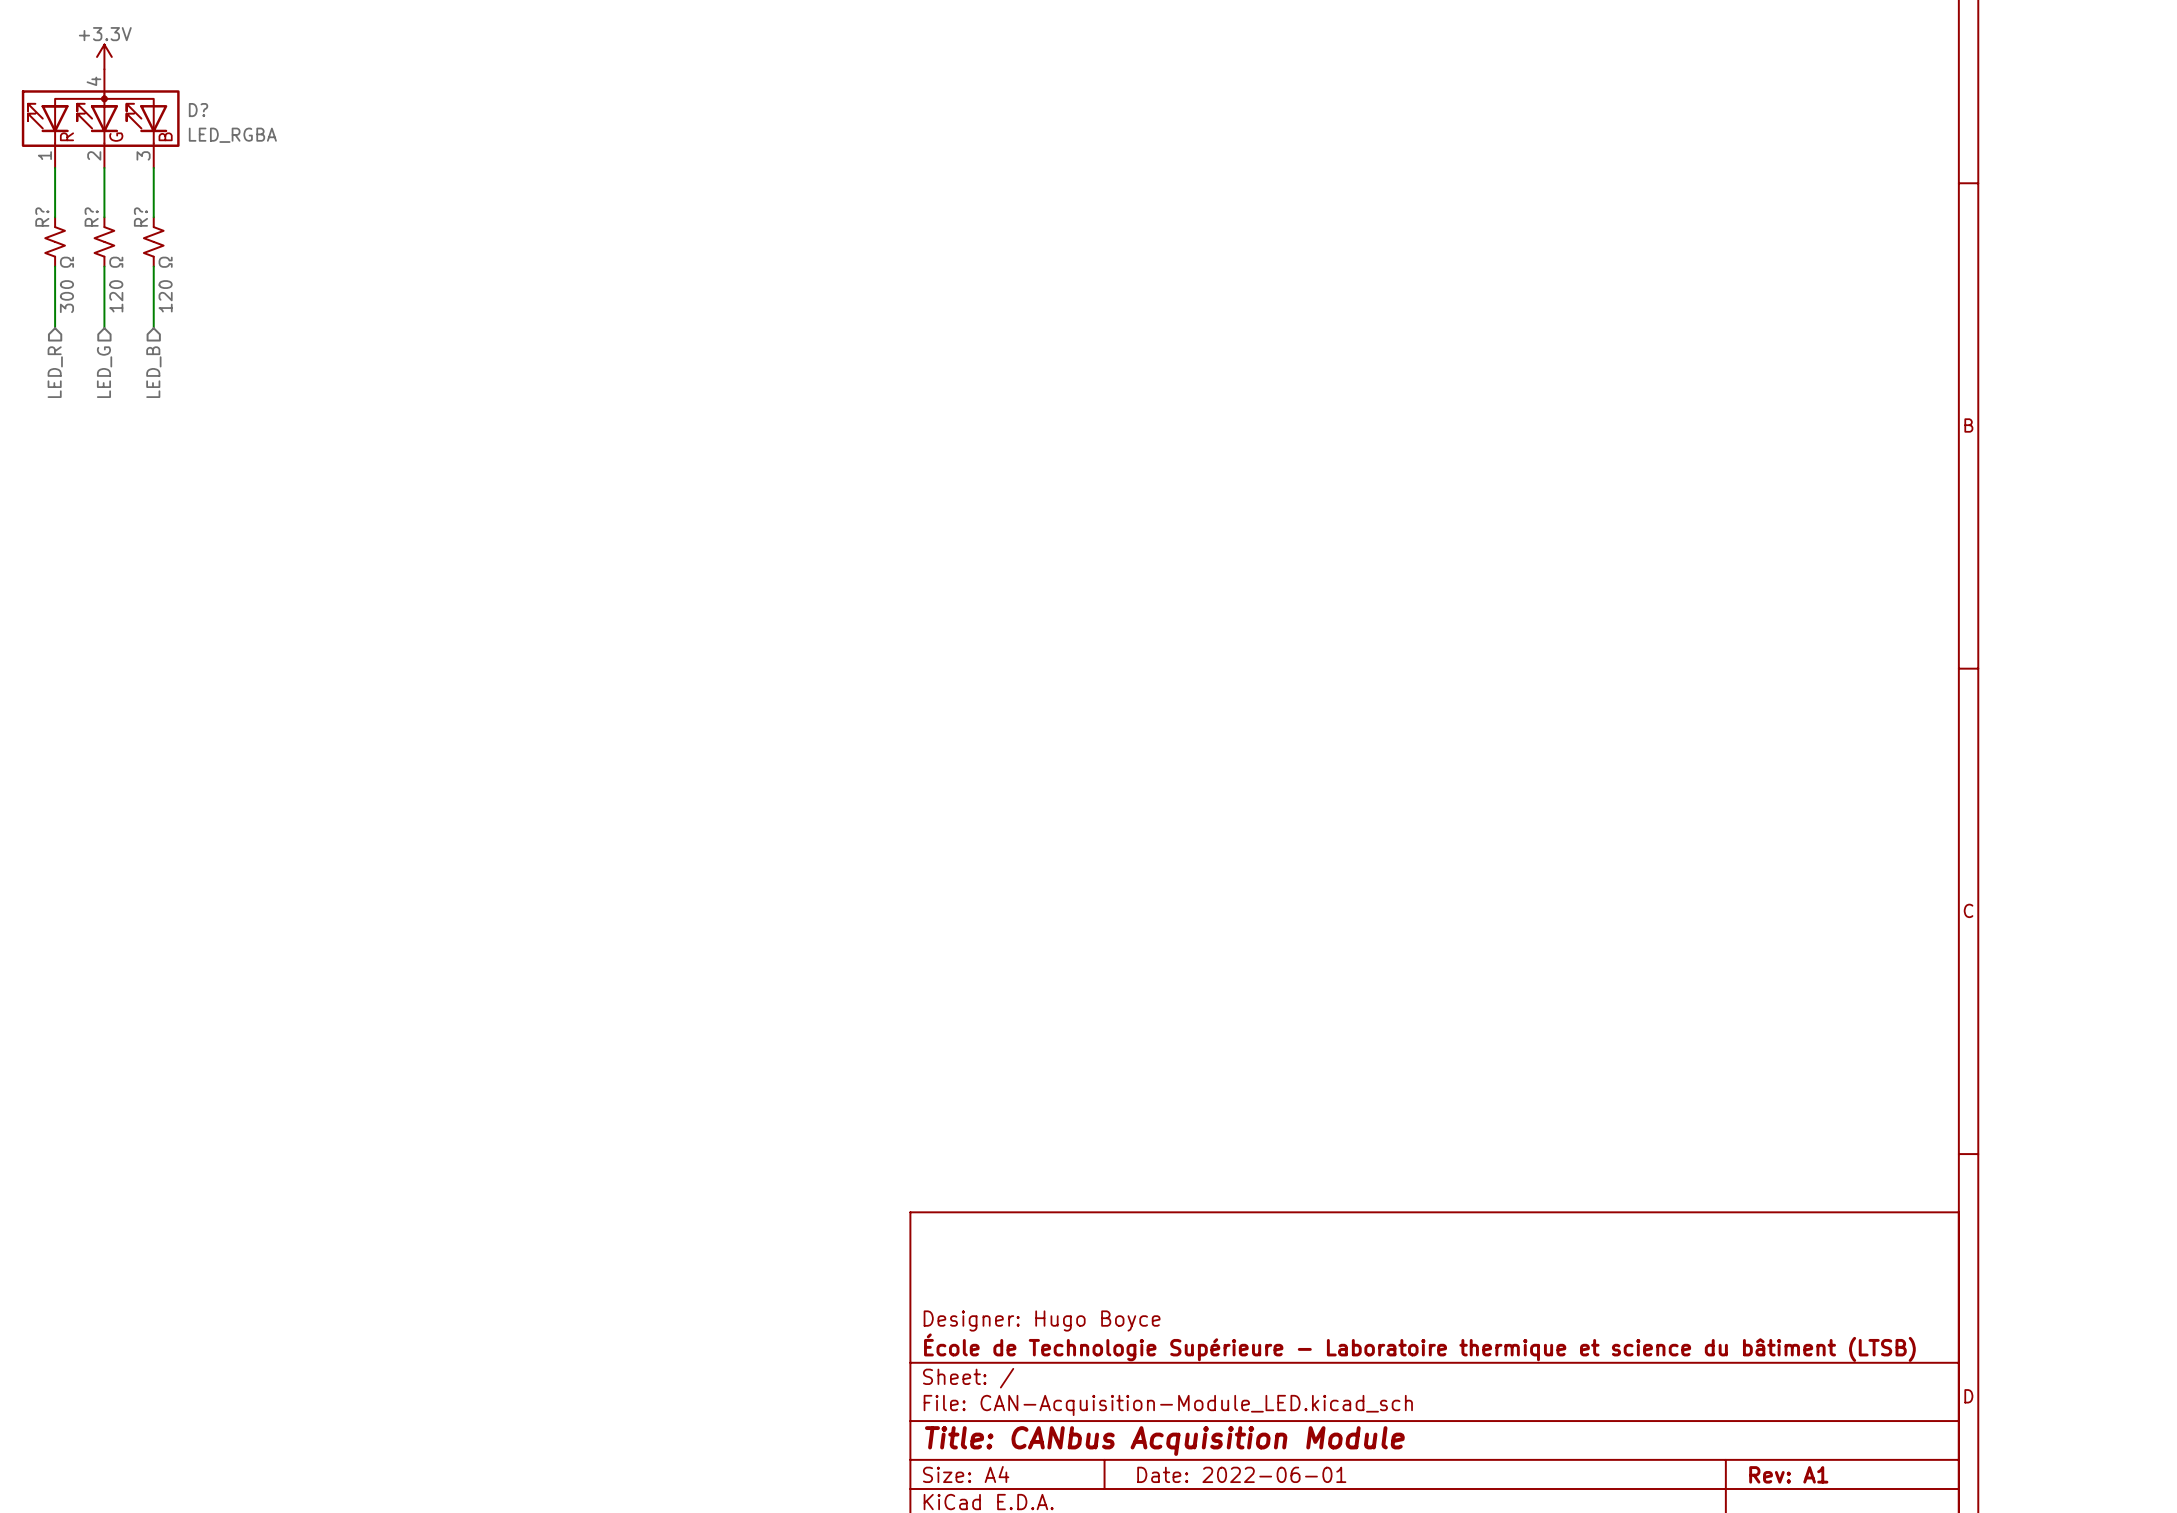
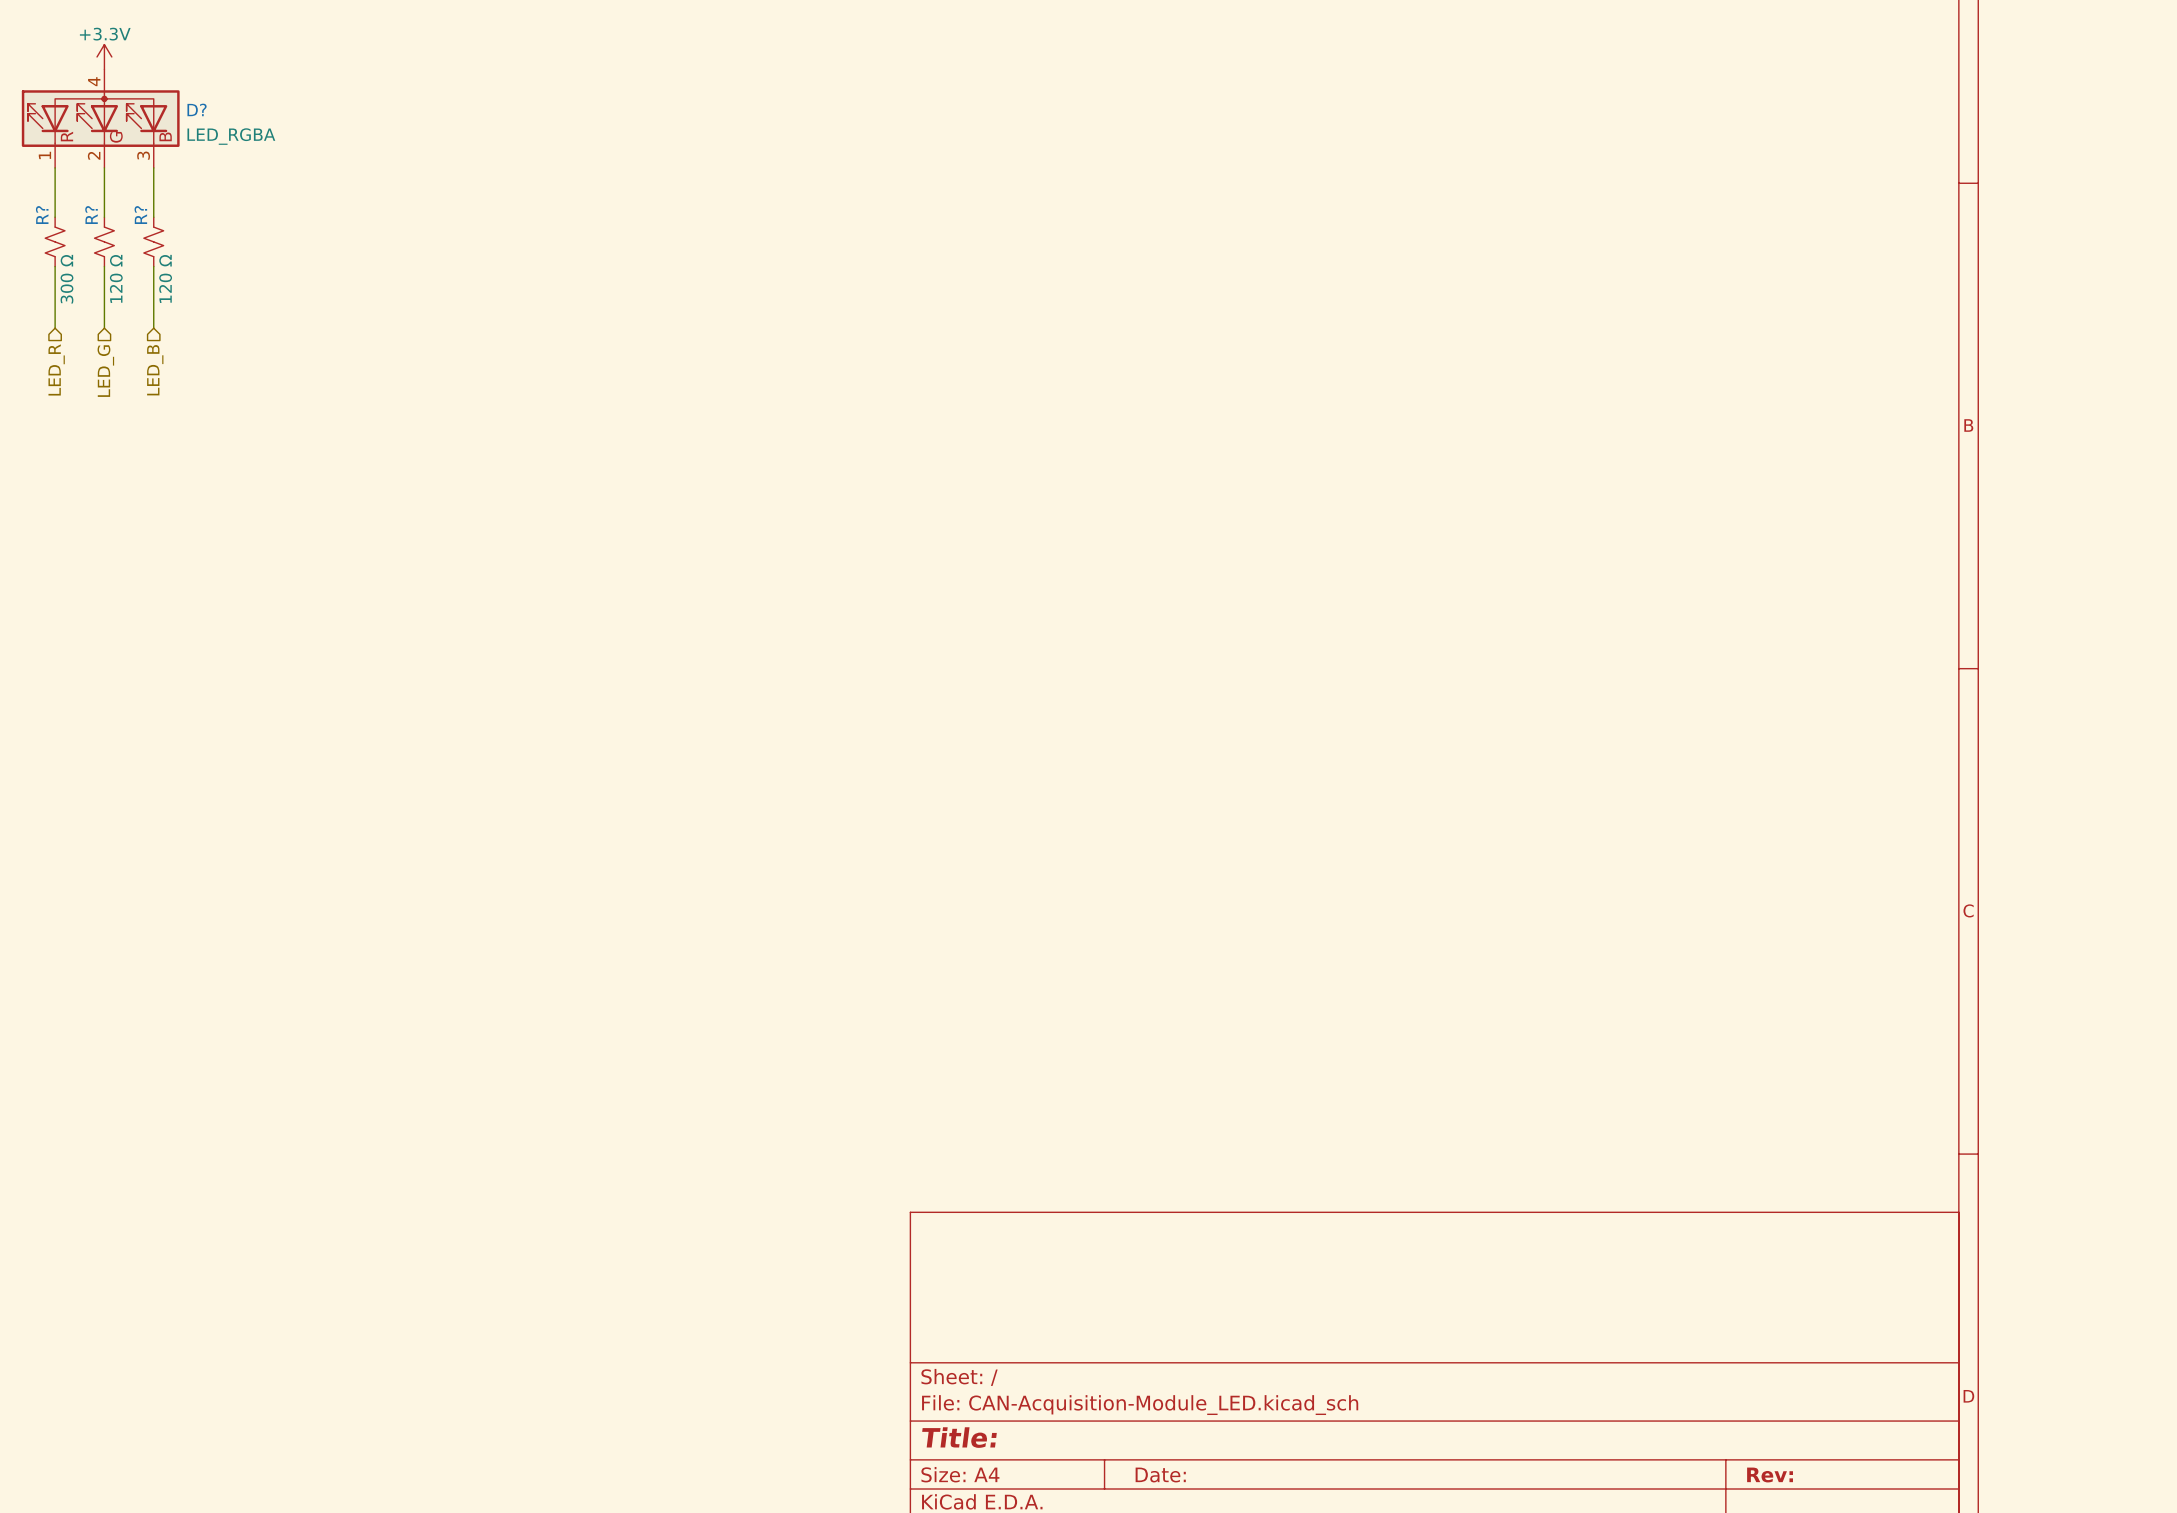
title block: Designer: Hugo Boyce (1042, 1320) -> none
title block: École de Technologie Supérieure - Laboratoire thermique et science du bâtiment (LTSB) (1419, 1347) -> none
title block: Title: CANbus Acquisition Module (1164, 1441) -> Title: (959, 1437)
title block: Date: 2022-06-01 (1241, 1474) -> Date: (1160, 1475)
title block: Rev: A1 (1788, 1474) -> Rev: (1770, 1475)

